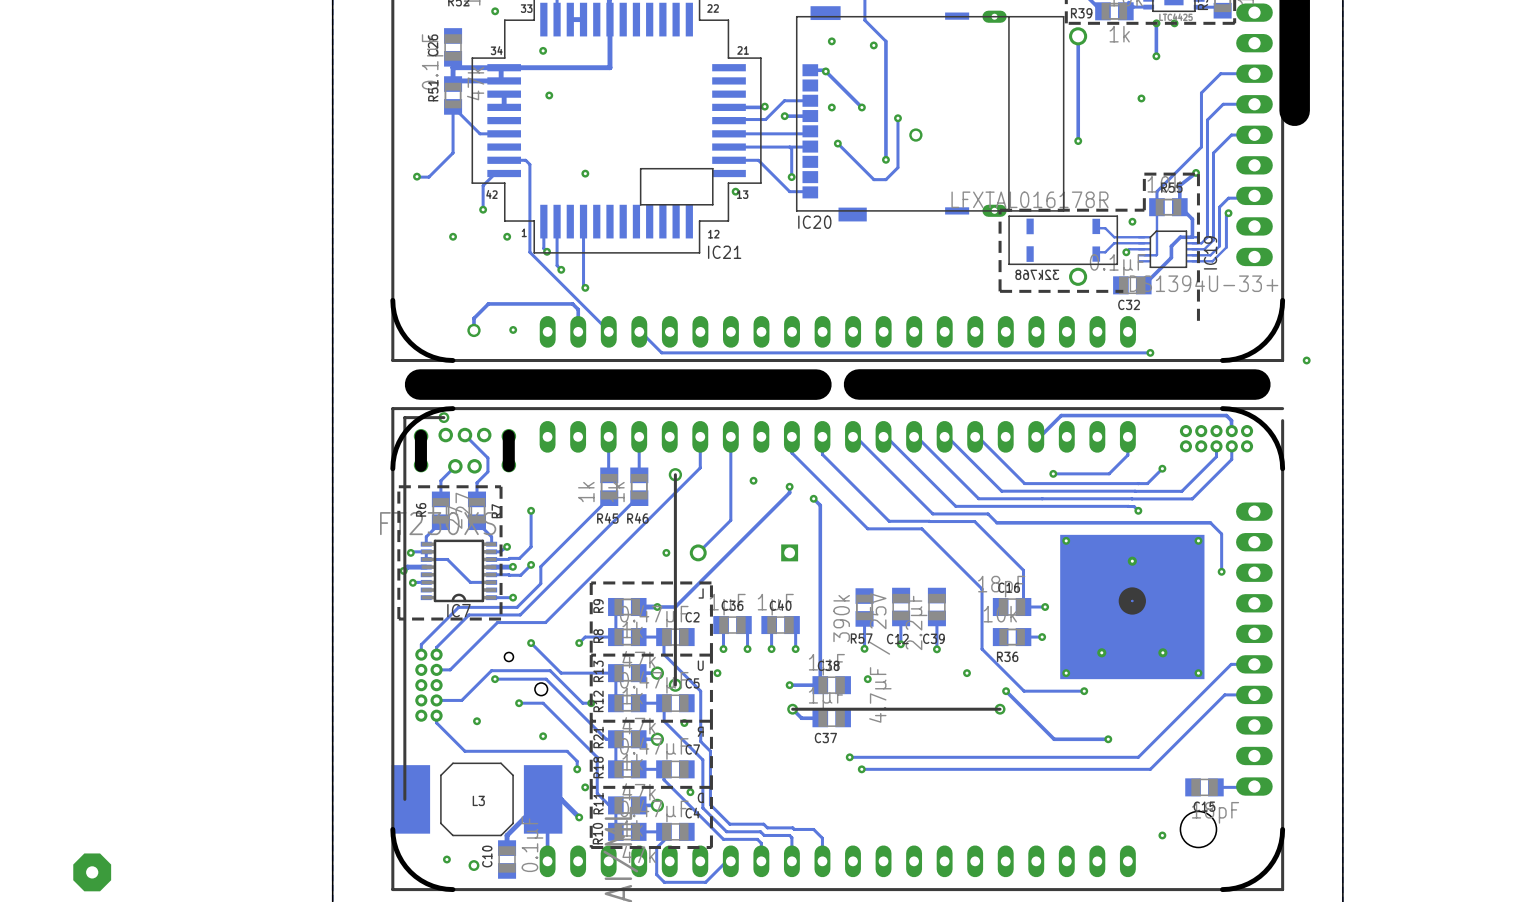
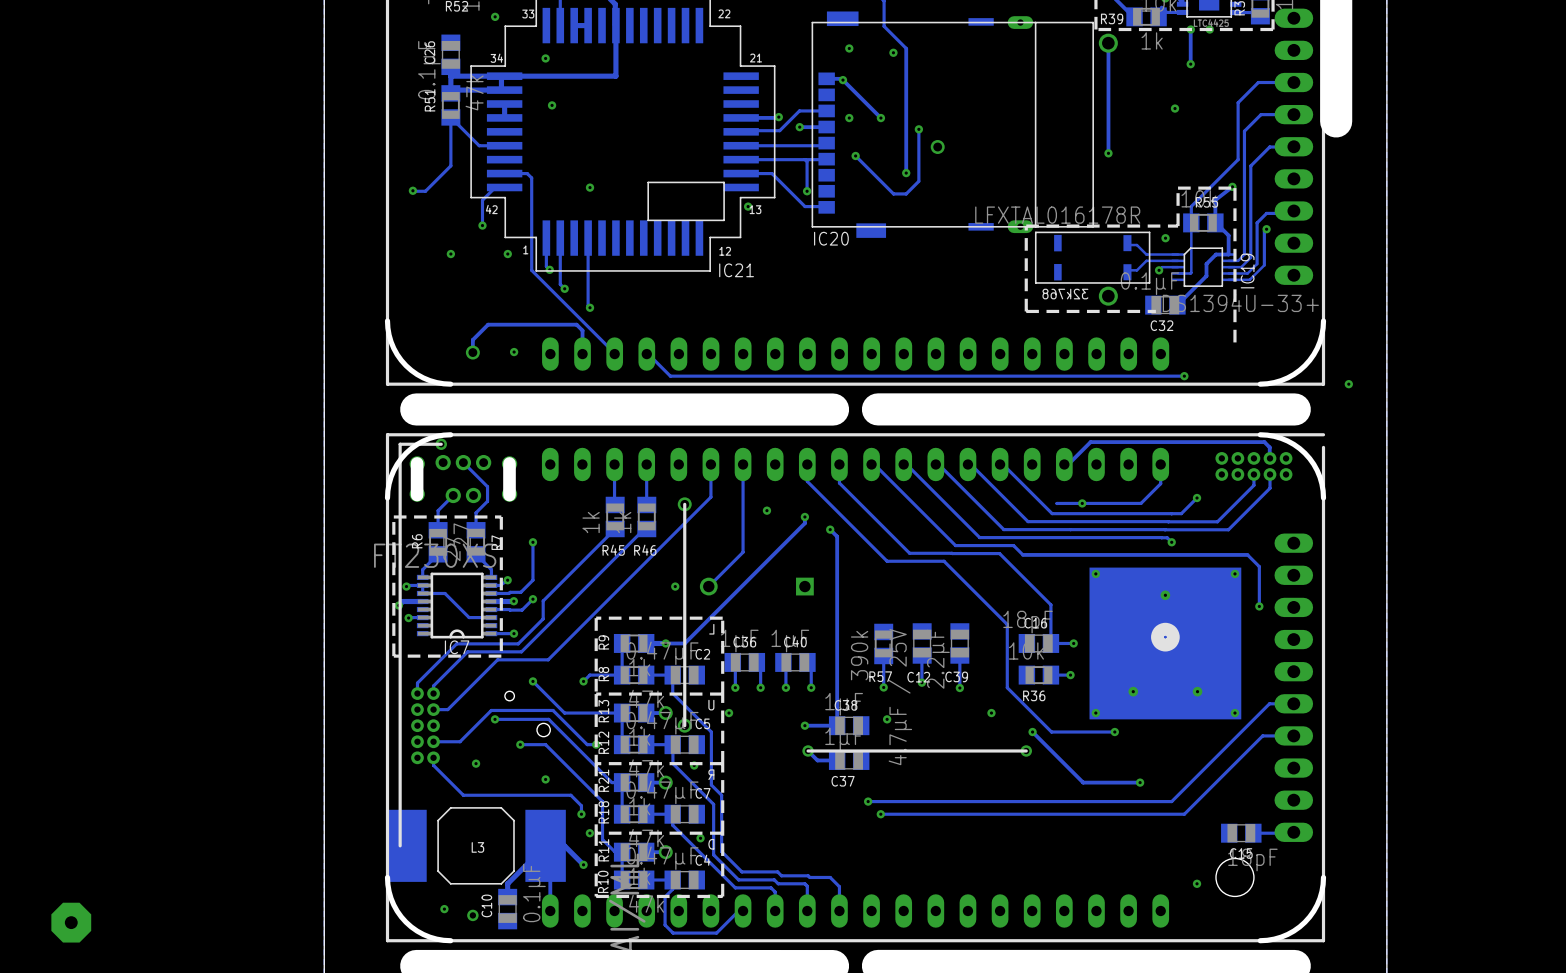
track: none -> (1082, 503) (1057, 503)

